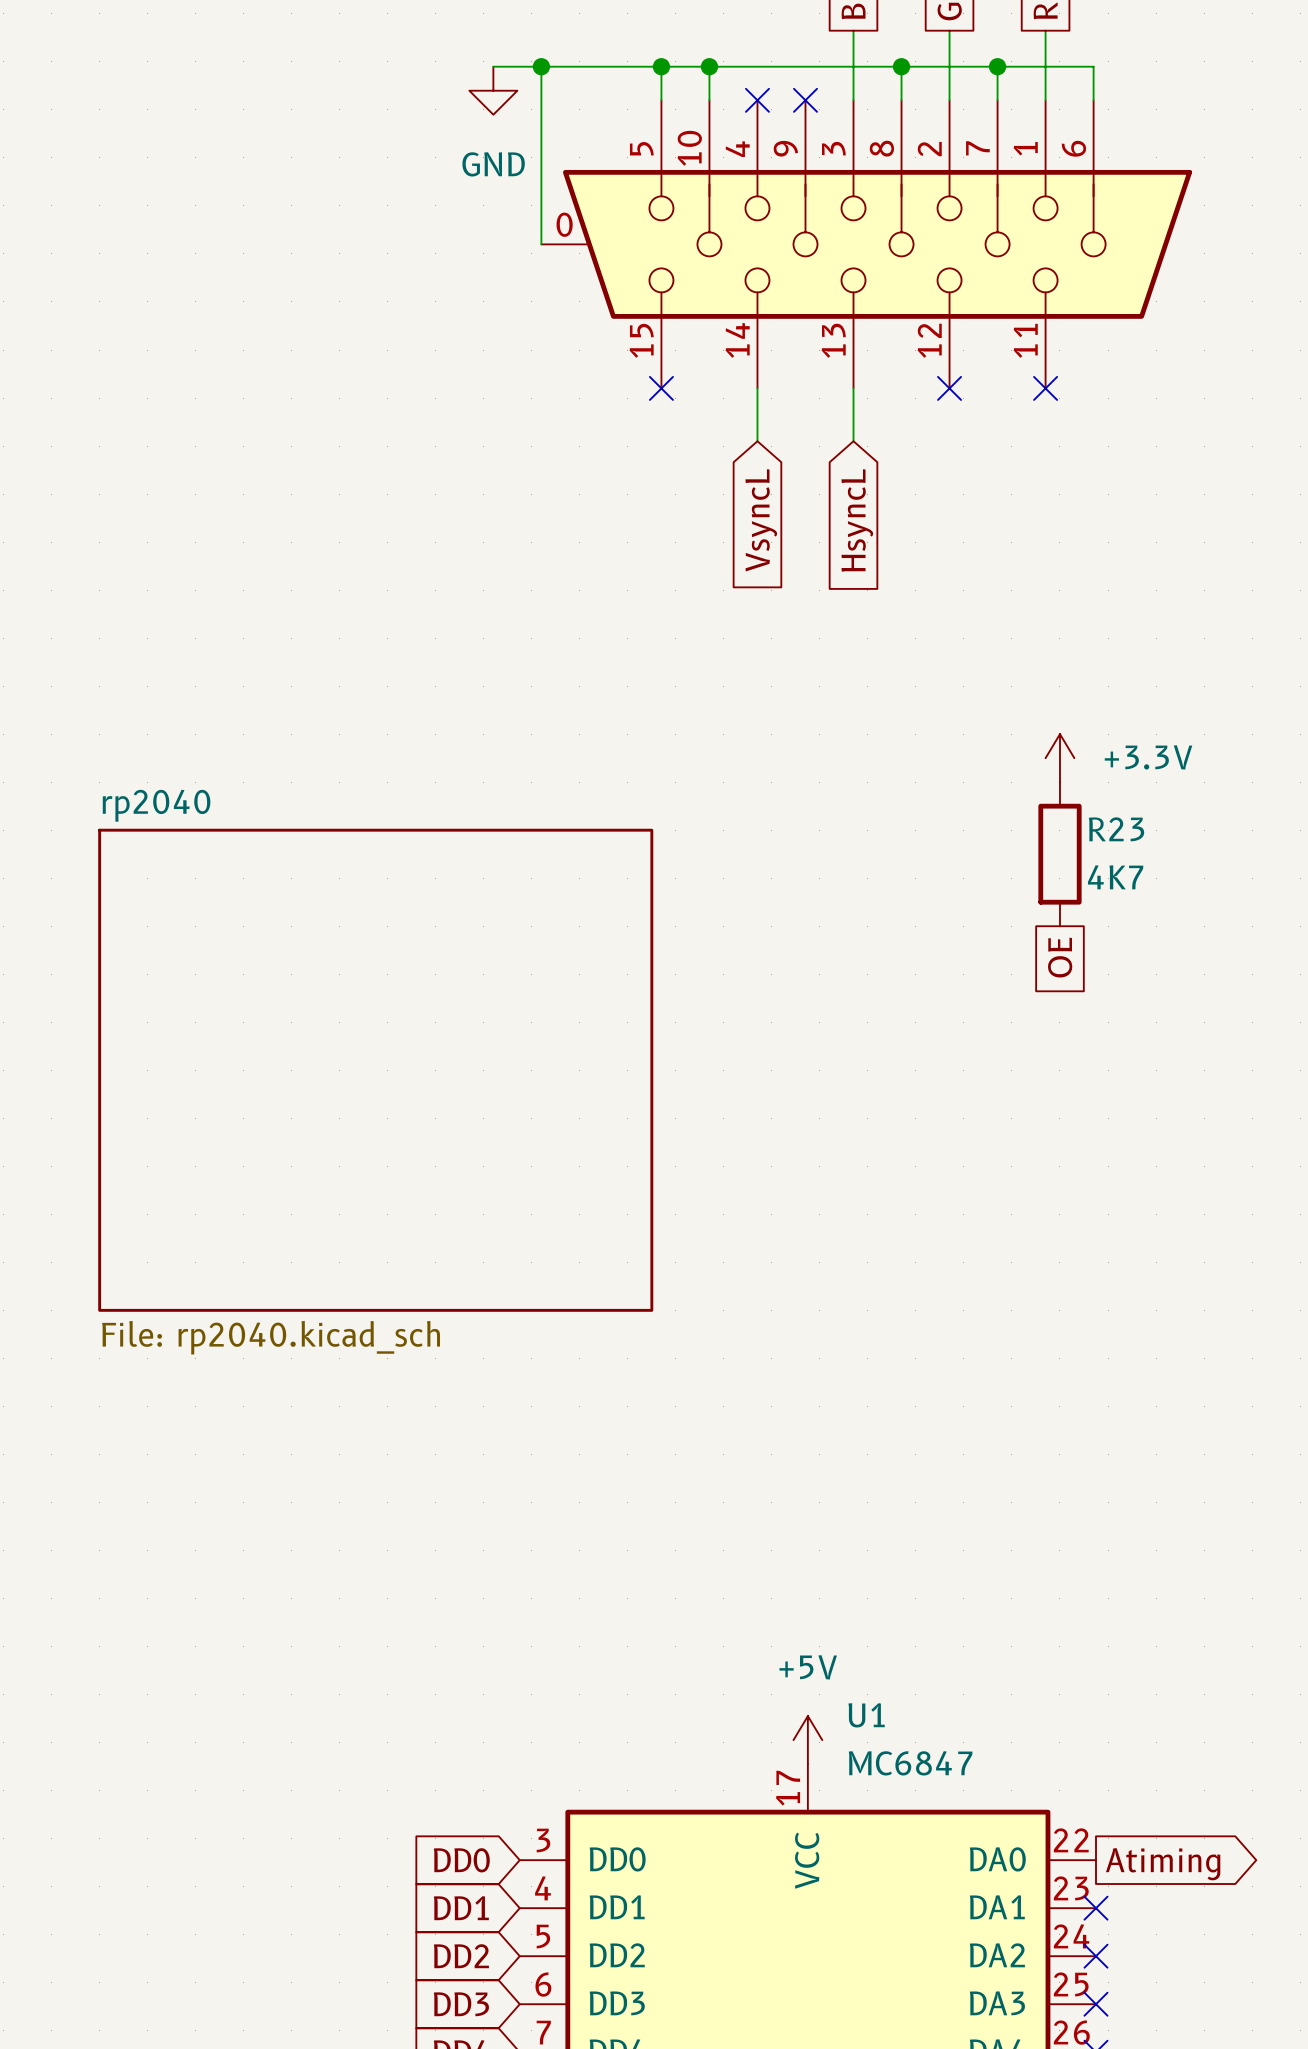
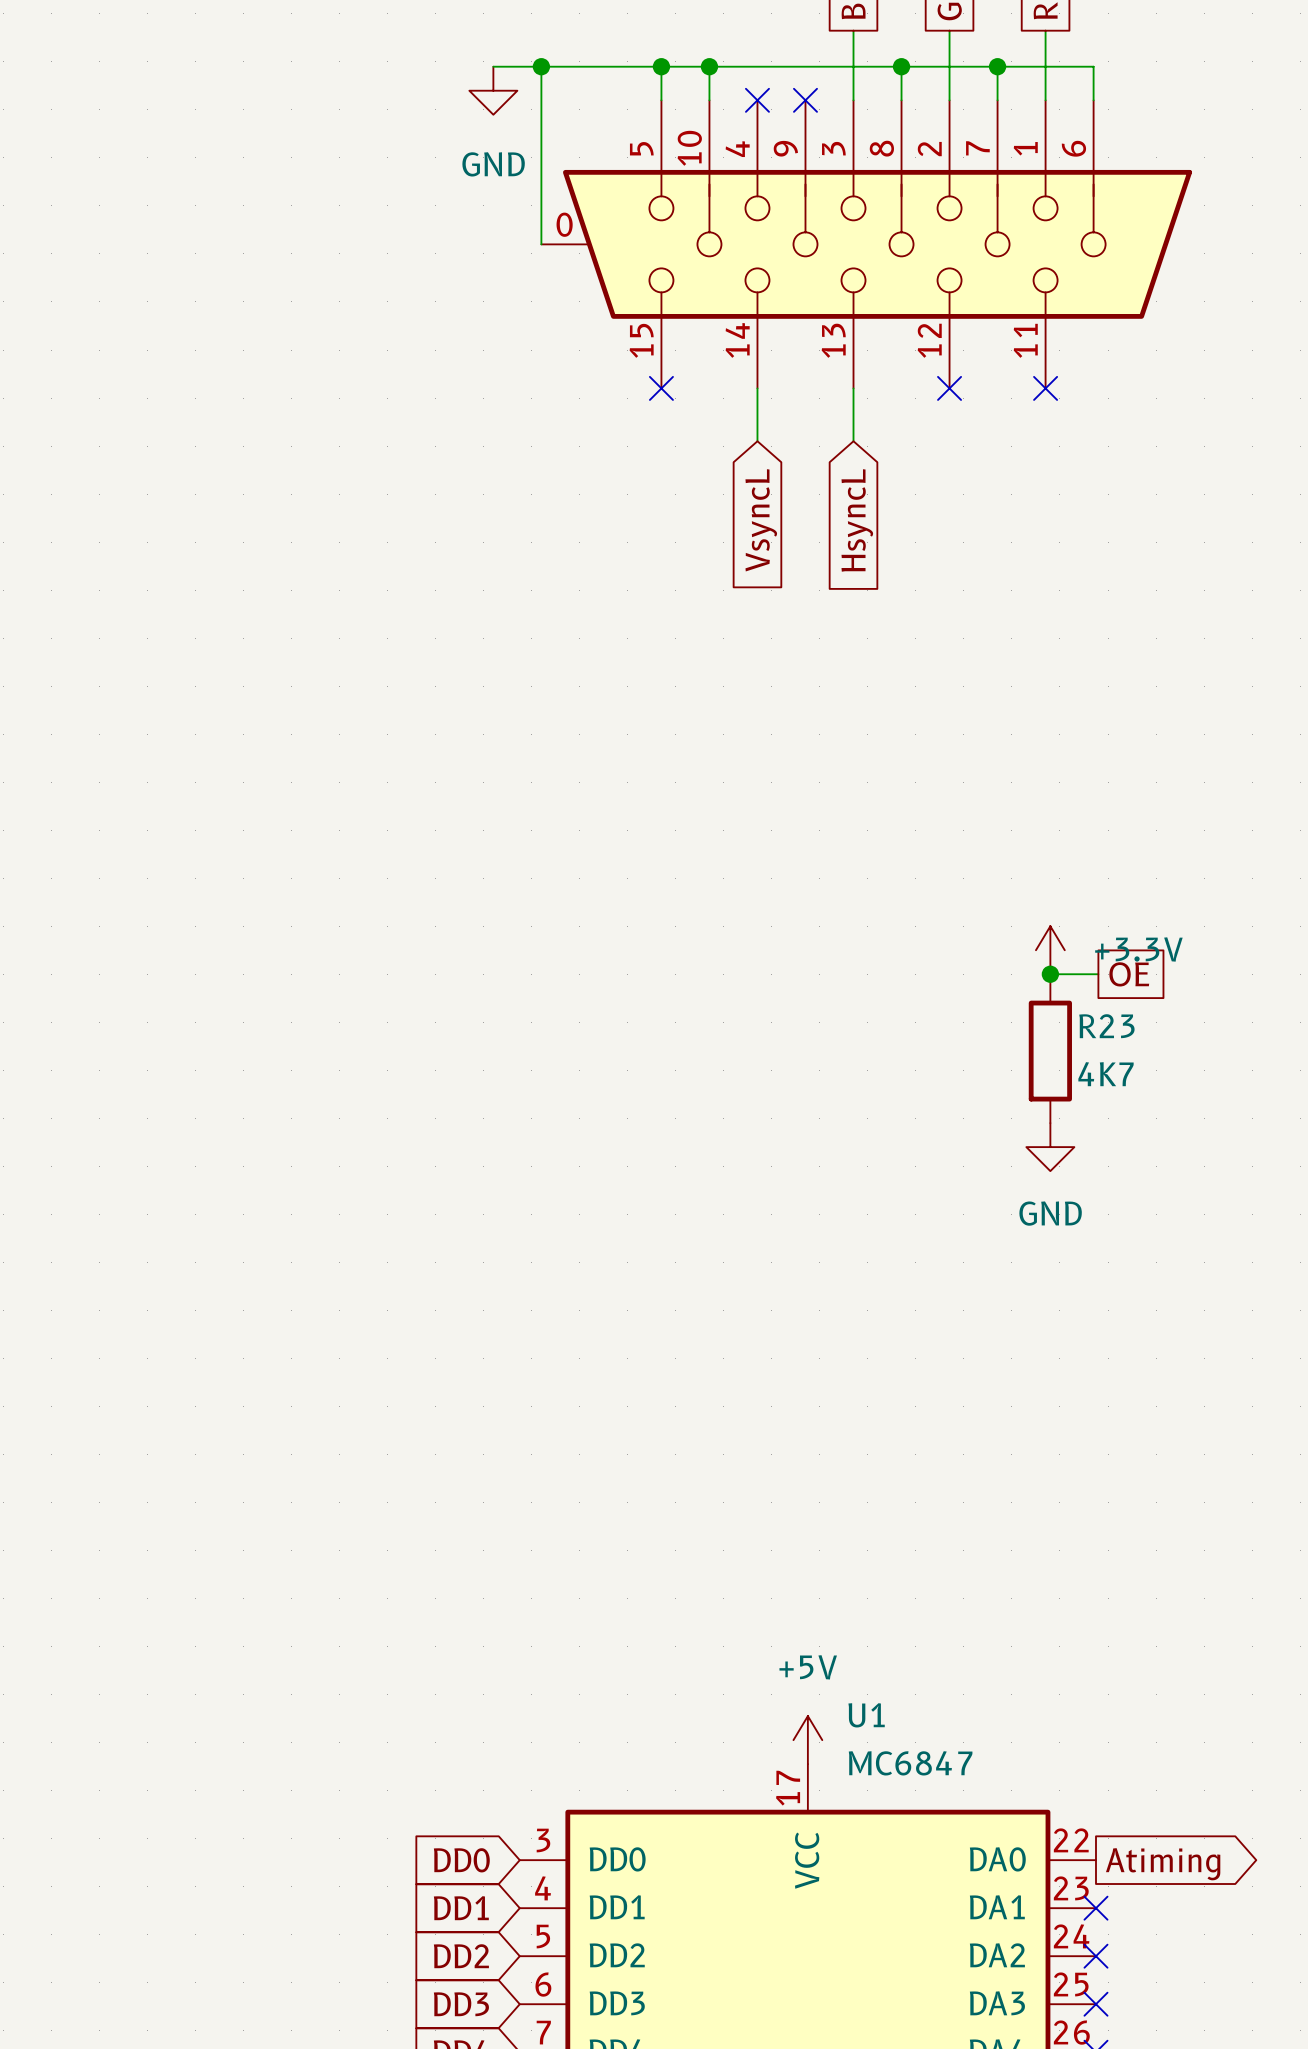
power symbol position: +3.3V (1059, 758) -> +3.3V (1050, 950)
R23 position: (1059, 854) -> (1050, 1051)
global label rotation: 0° (1060, 957) -> 90° counterclockwise (1129, 974)
junction: none -> (1050, 974)
wire: none -> (1098, 974) (1050, 974) (1050, 979)
sheet rp2040: File: rp2040.kicad_sch (375, 1070) -> none
power symbol: none -> GND (1050, 1147)

